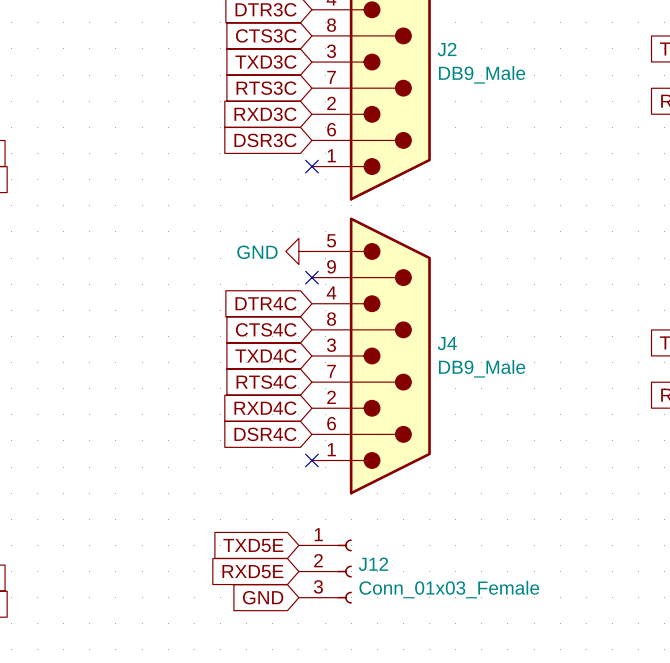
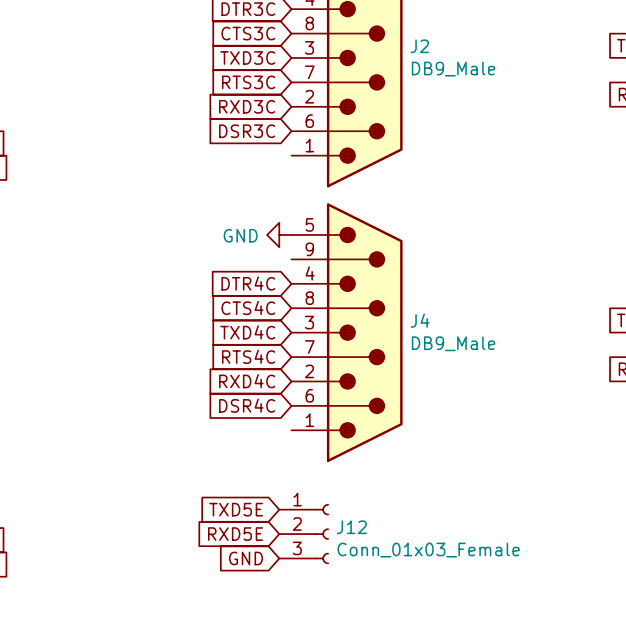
no-connect mark: (311, 166) -> none
no-connect mark: (311, 277) -> none
no-connect mark: (311, 460) -> none

